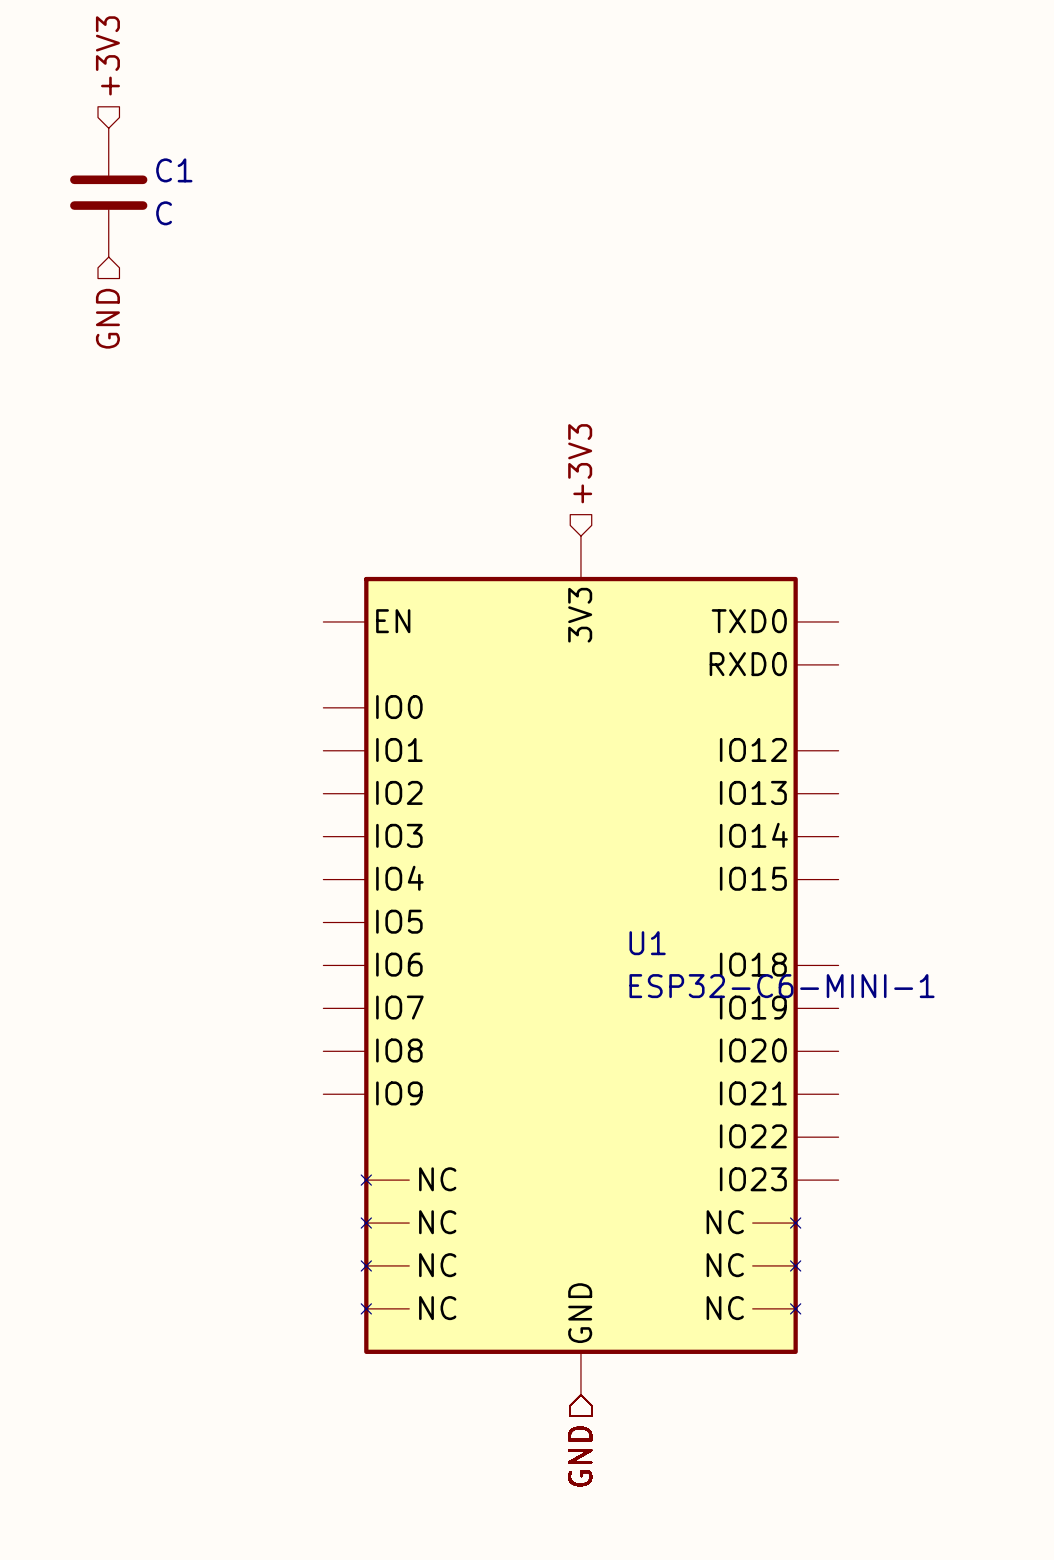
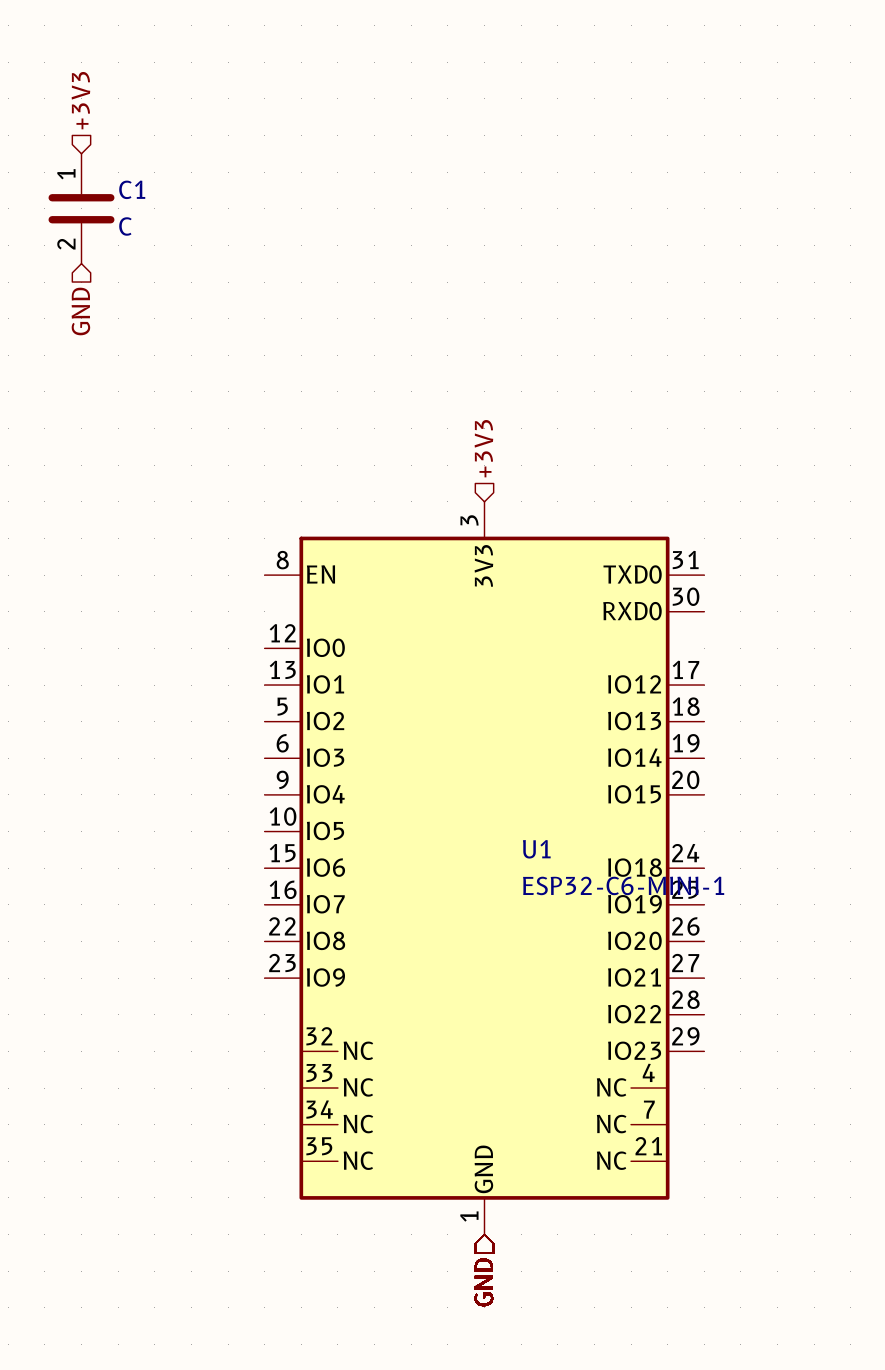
C1 pin number: none -> 1 (66, 174)
C1 pin number: none -> 2 (66, 244)
U1 symbol: [323, 536, 839, 1395] -> [264, 501, 705, 1235]

